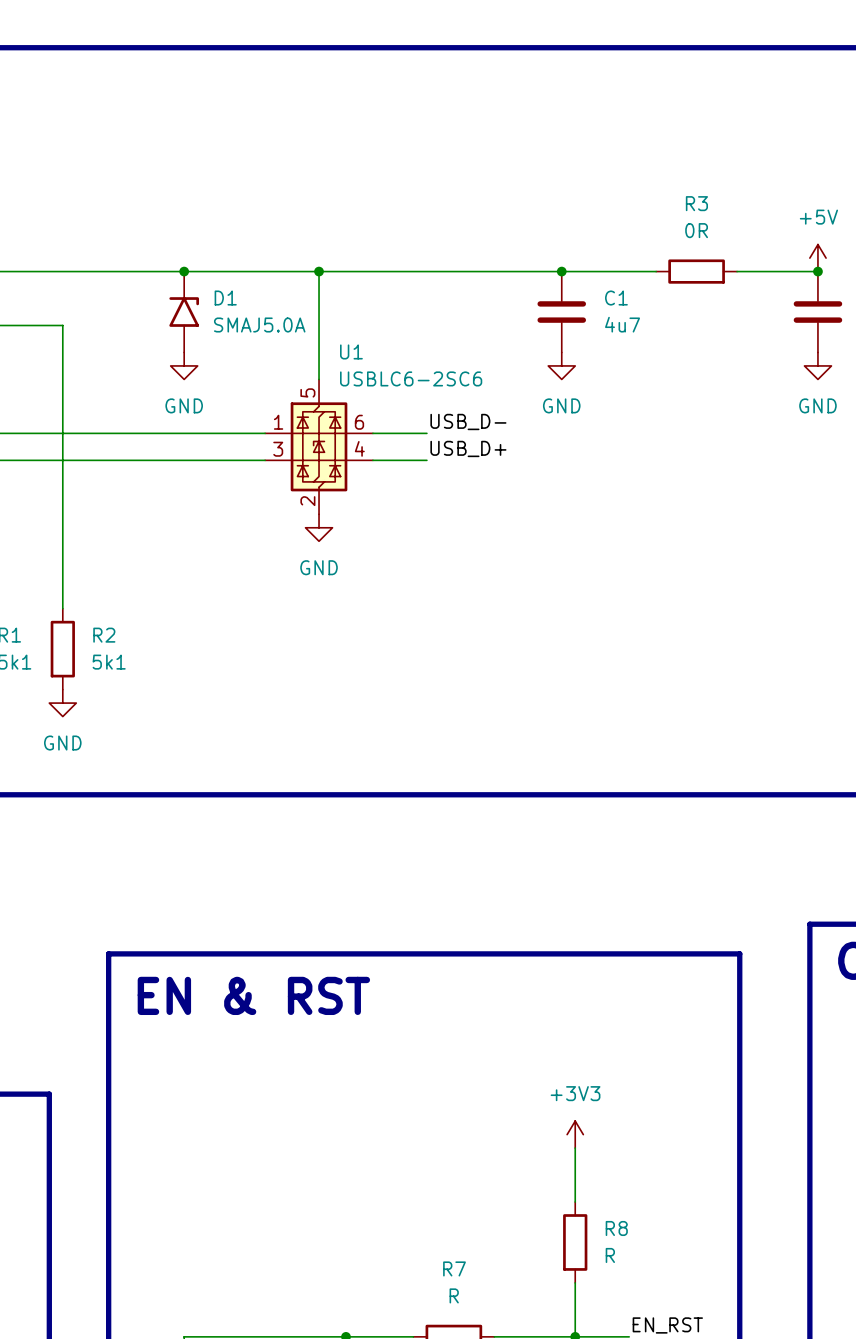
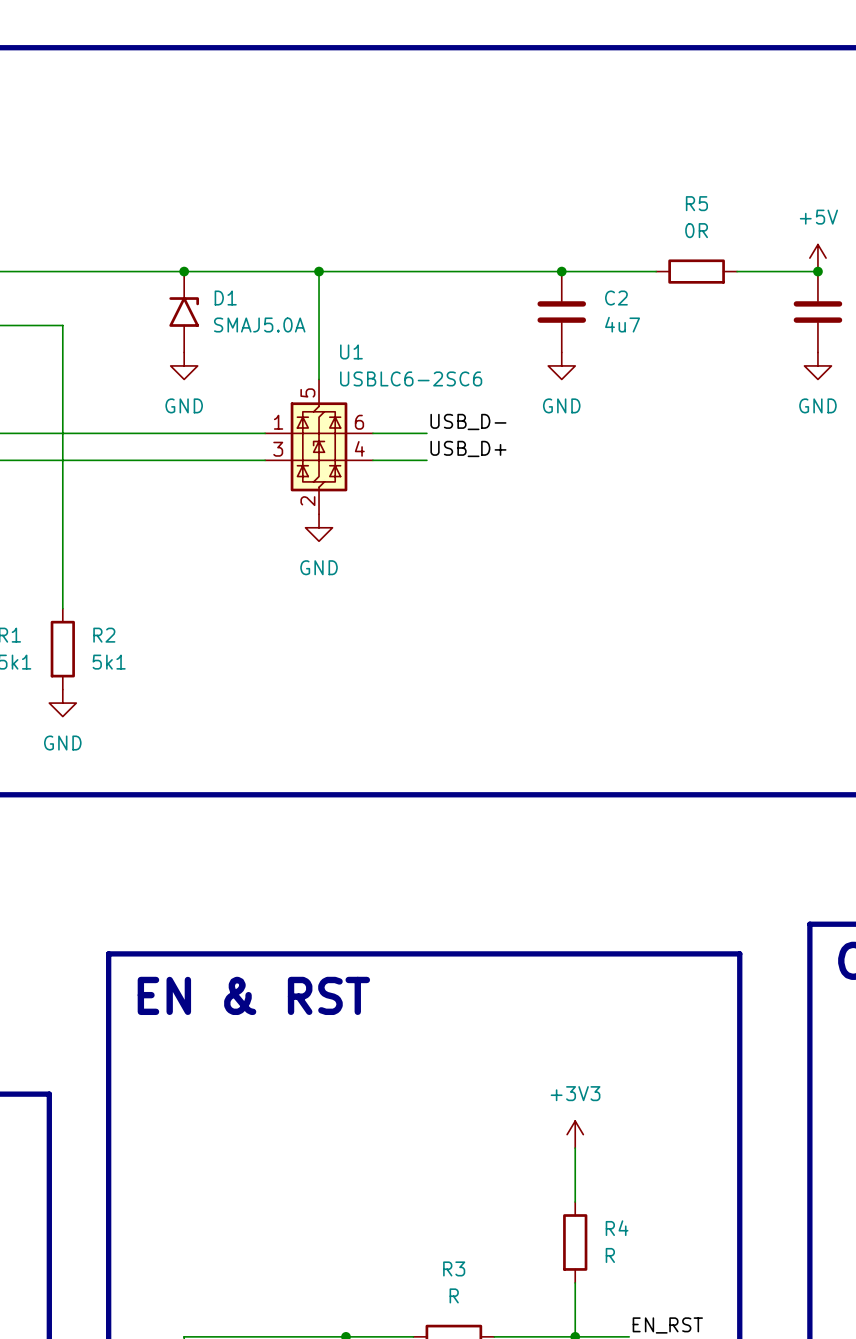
R3 name: R3 (696, 203) -> R5 (696, 203)
C1 name: C1 (616, 298) -> C2 (616, 298)
R8 name: R8 (616, 1228) -> R4 (617, 1228)
R7 name: R7 (454, 1268) -> R3 (454, 1268)

